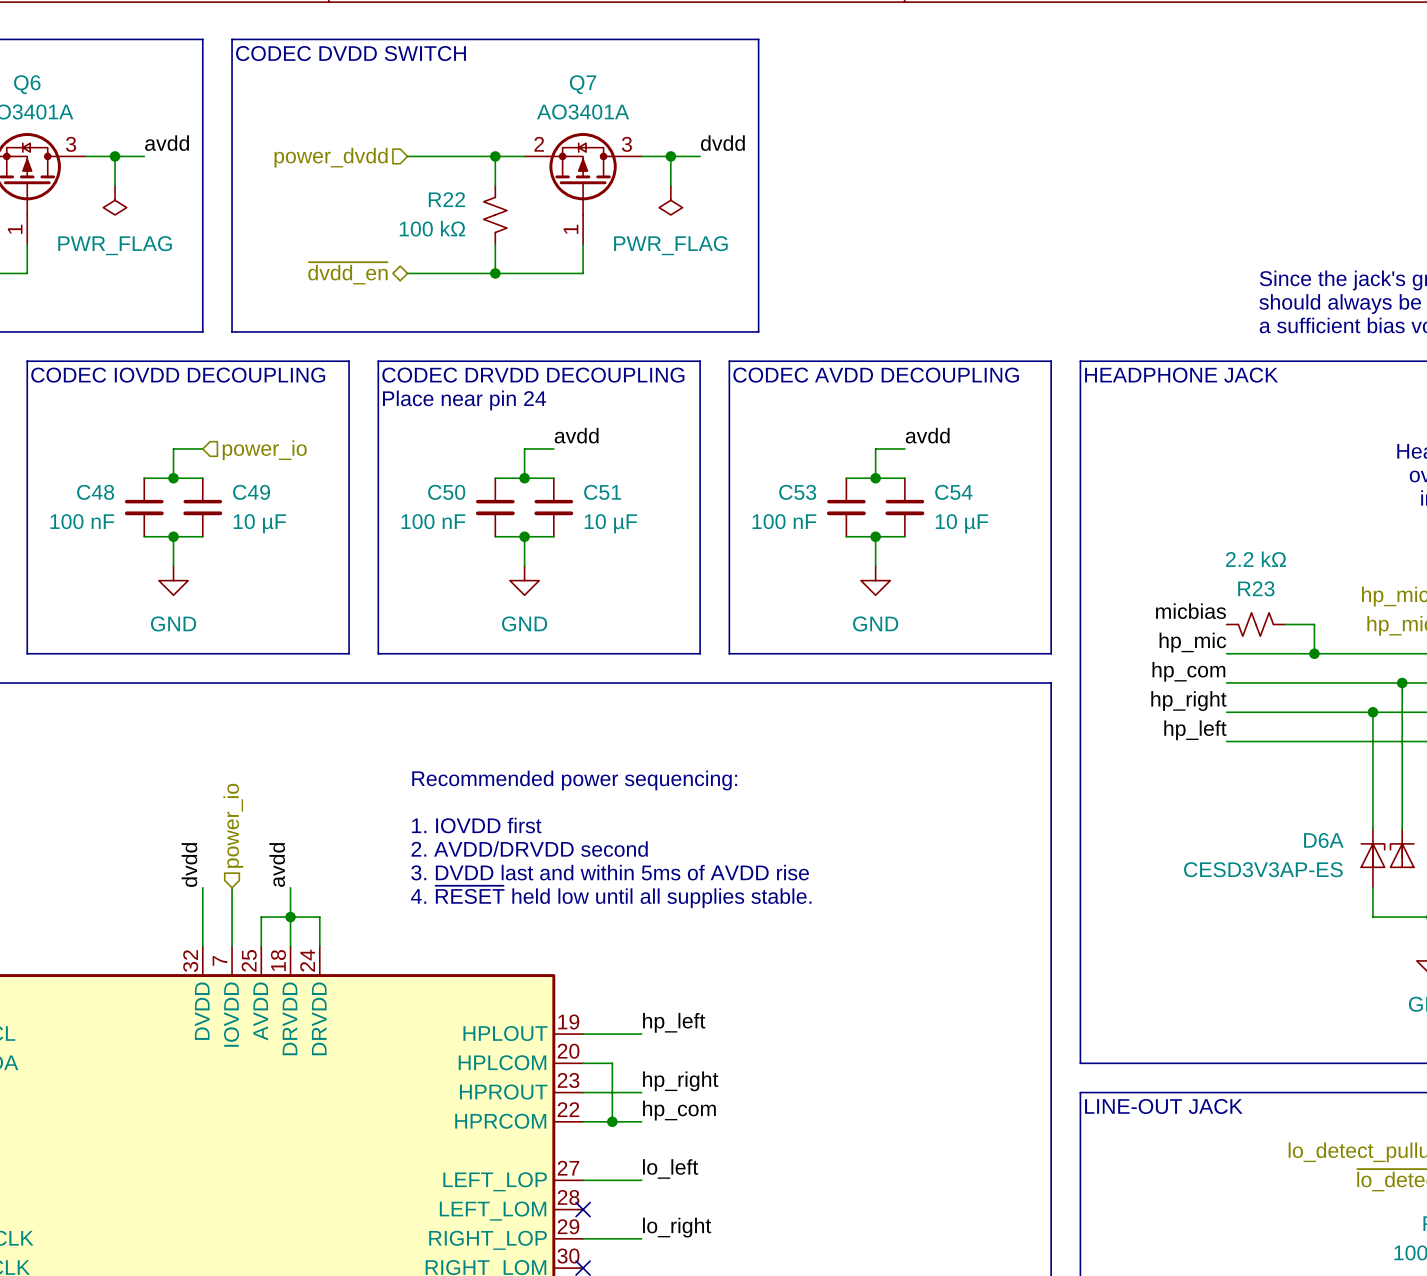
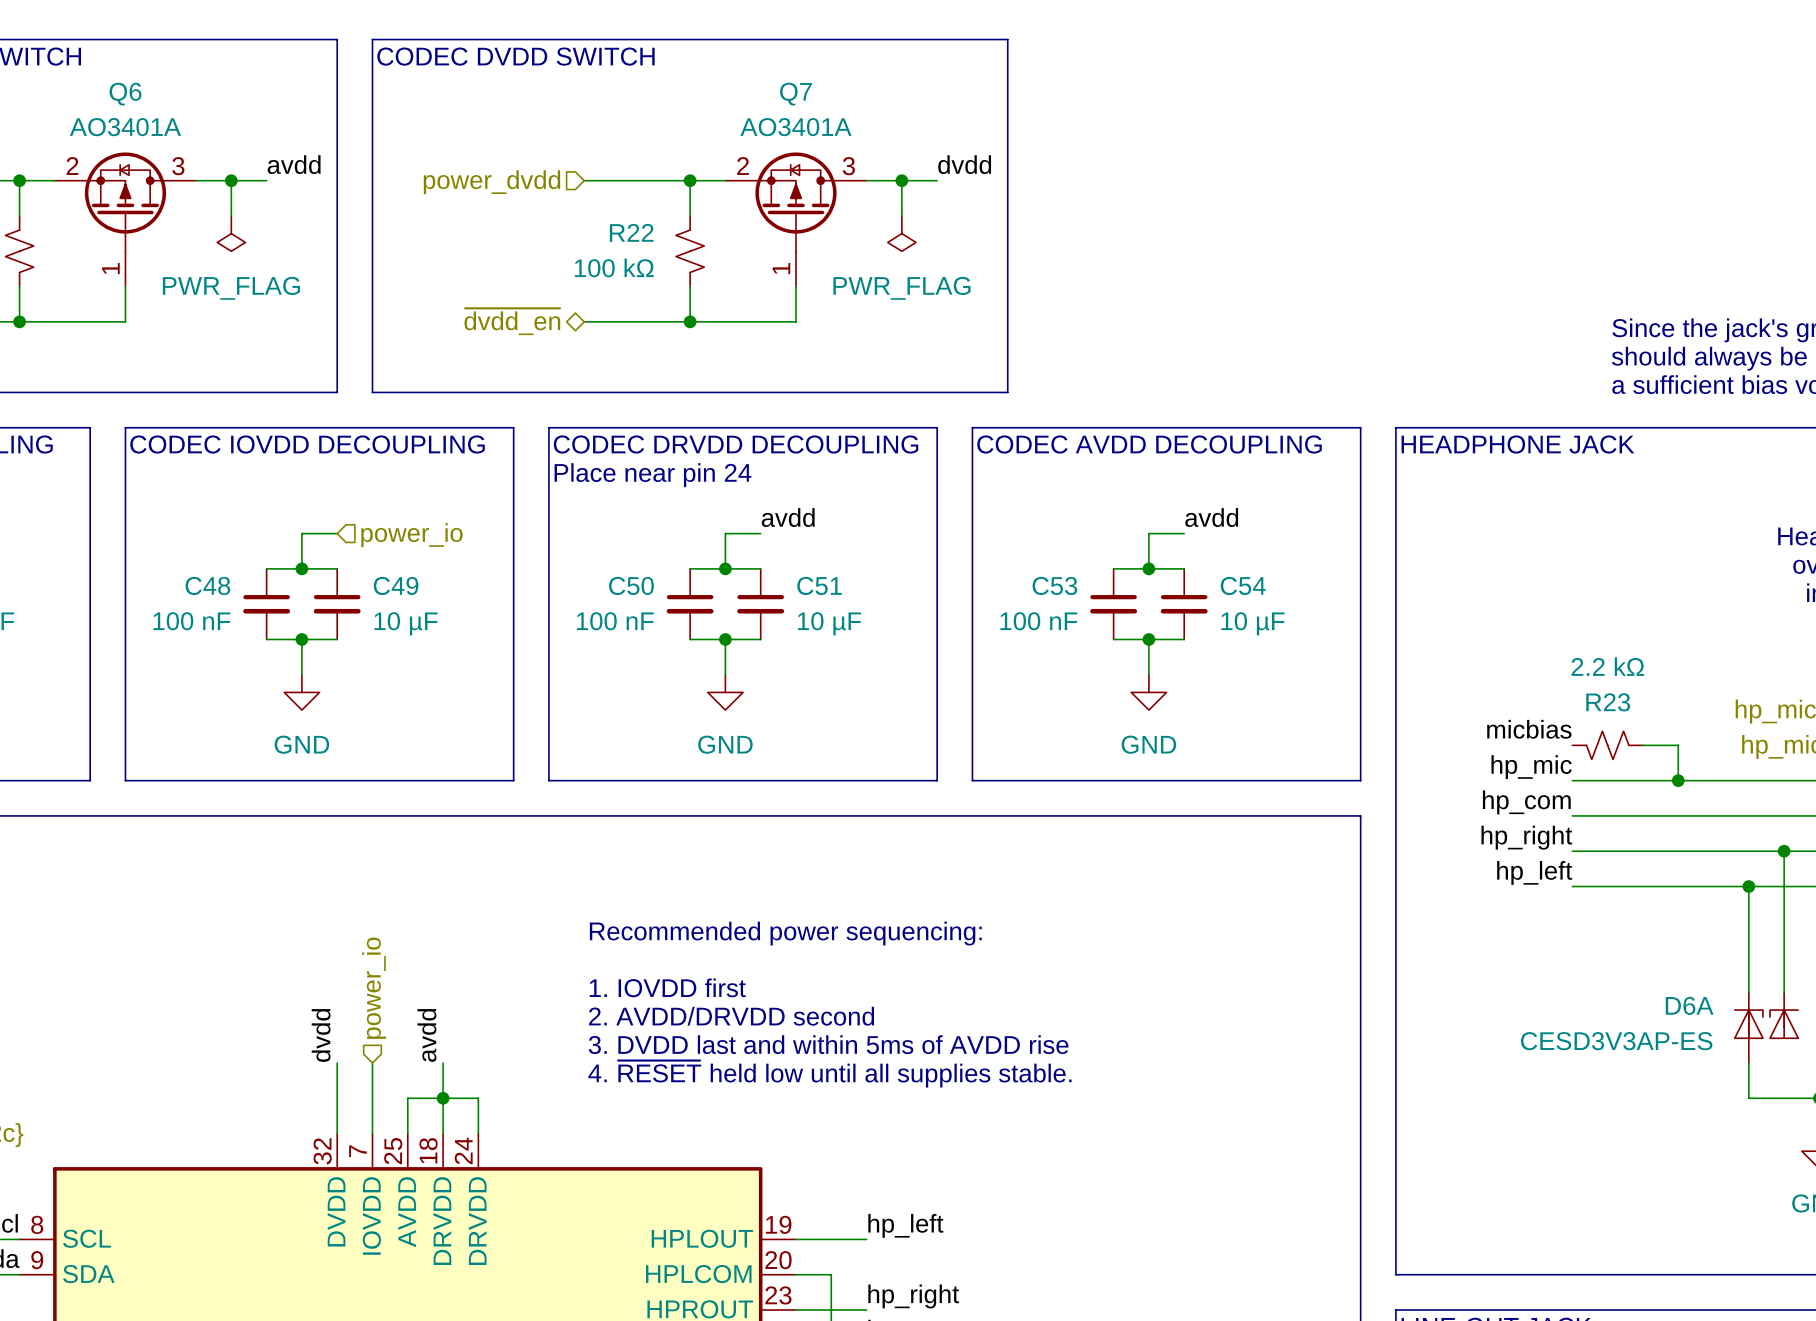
wire: (1402, 683) (1402, 712) -> none
junction: (1402, 683) -> none
wire: (1372, 712) (1372, 741) -> none
junction: (1372, 712) -> none
junction: none -> (1784, 851)
junction: none -> (1748, 886)

